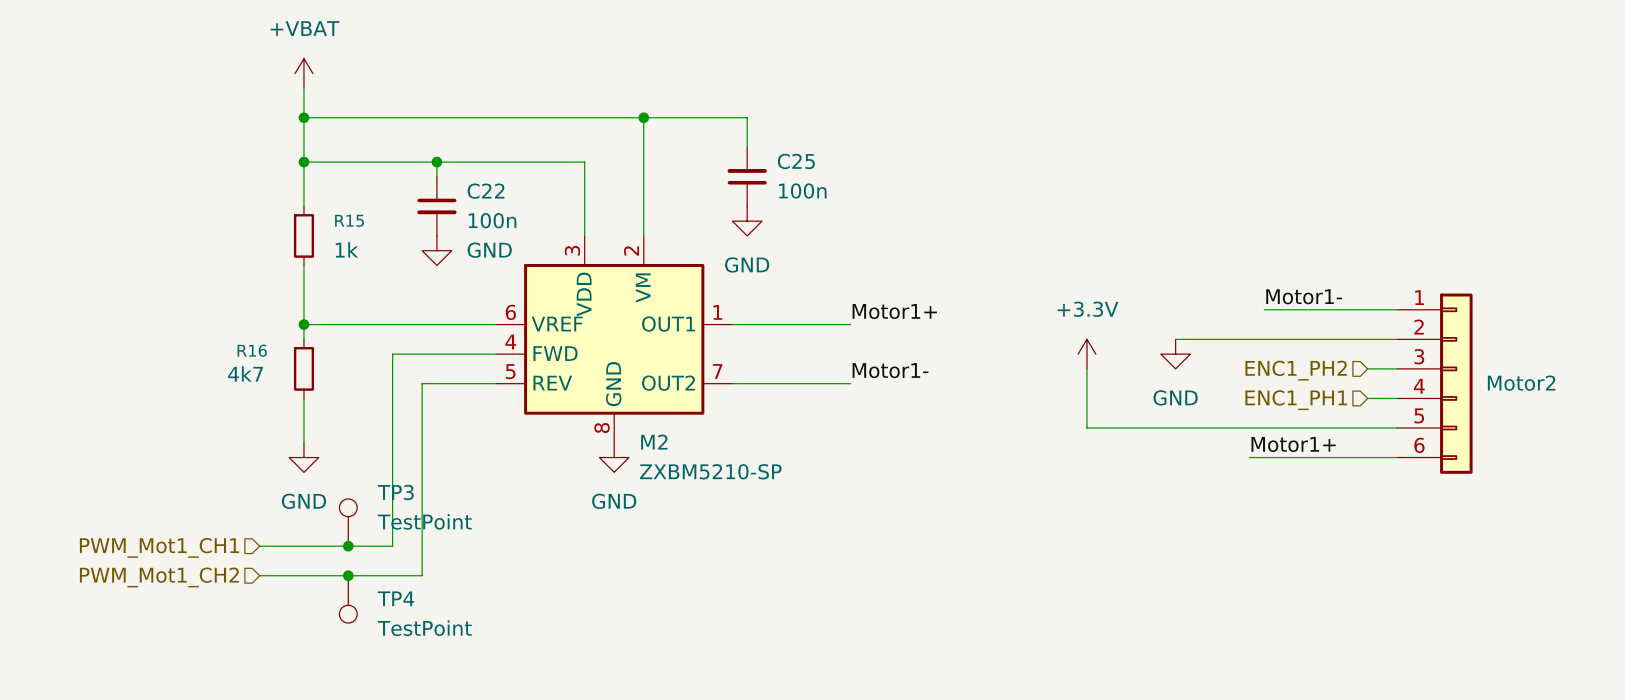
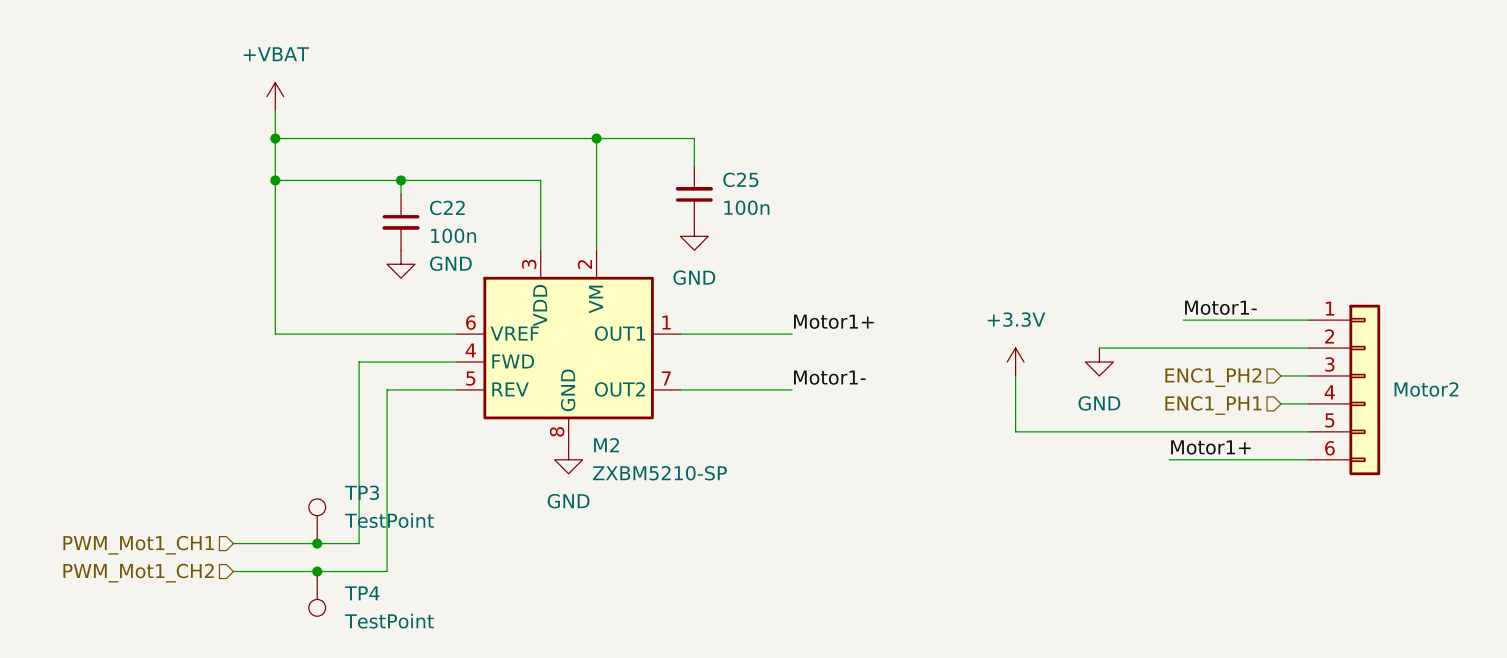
wire: none -> (275, 222) (275, 278)
R15: 1k (303, 235) -> none
wire: (303, 324) (303, 339) -> none
junction: (303, 324) -> none
R16: 4k7 (303, 368) -> none
wire: (303, 398) (303, 442) -> none
power symbol: GND (303, 457) -> none

